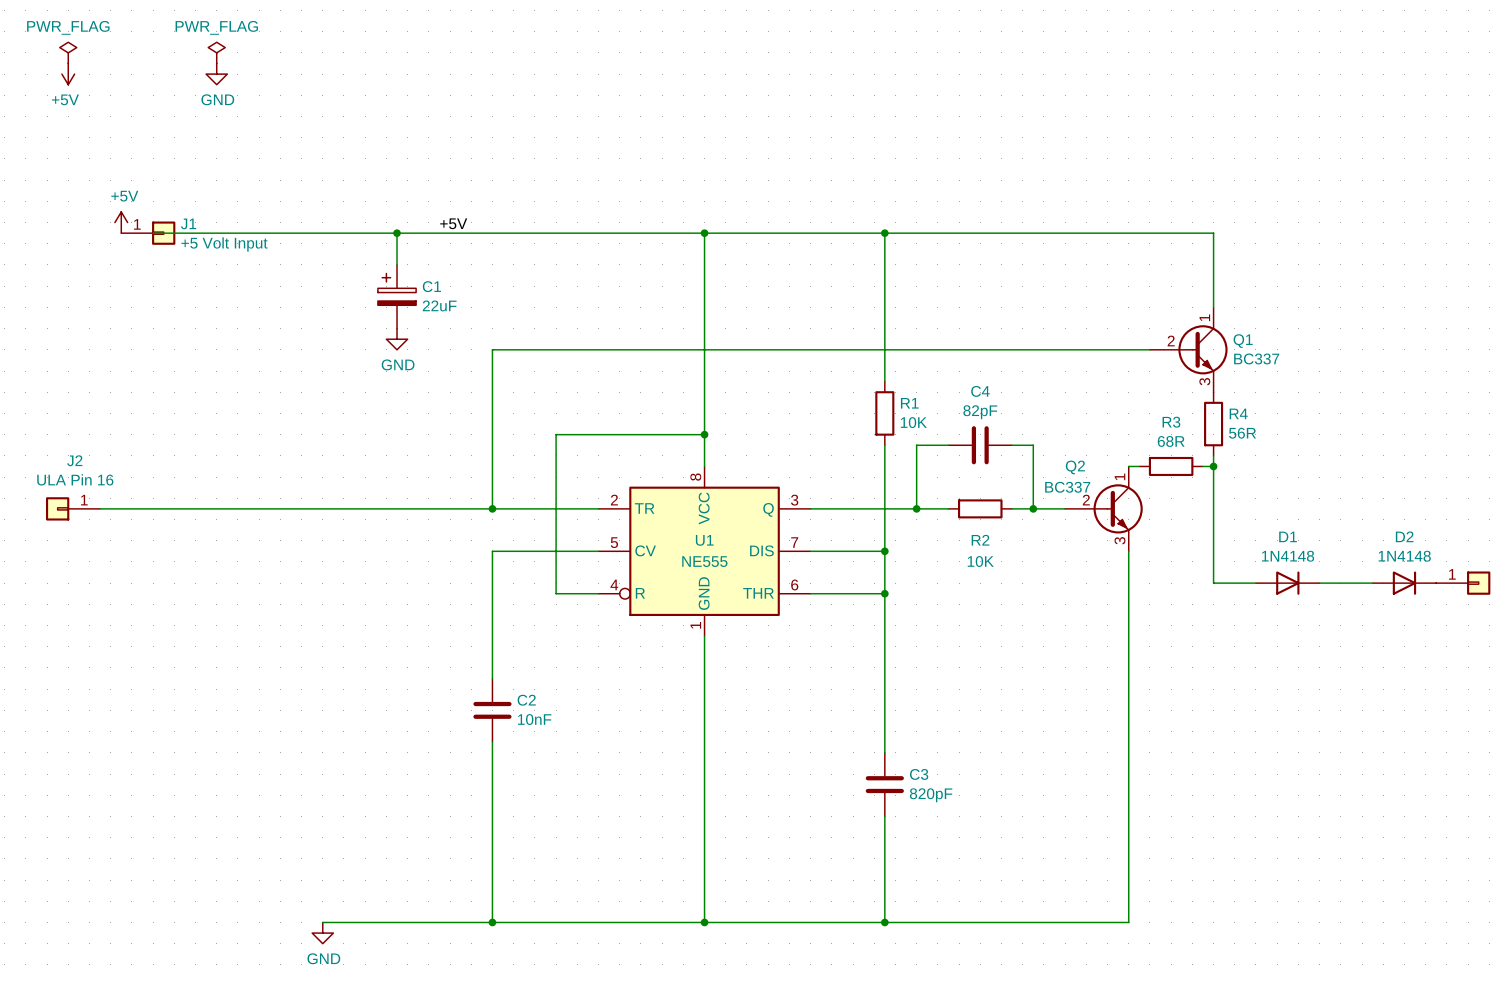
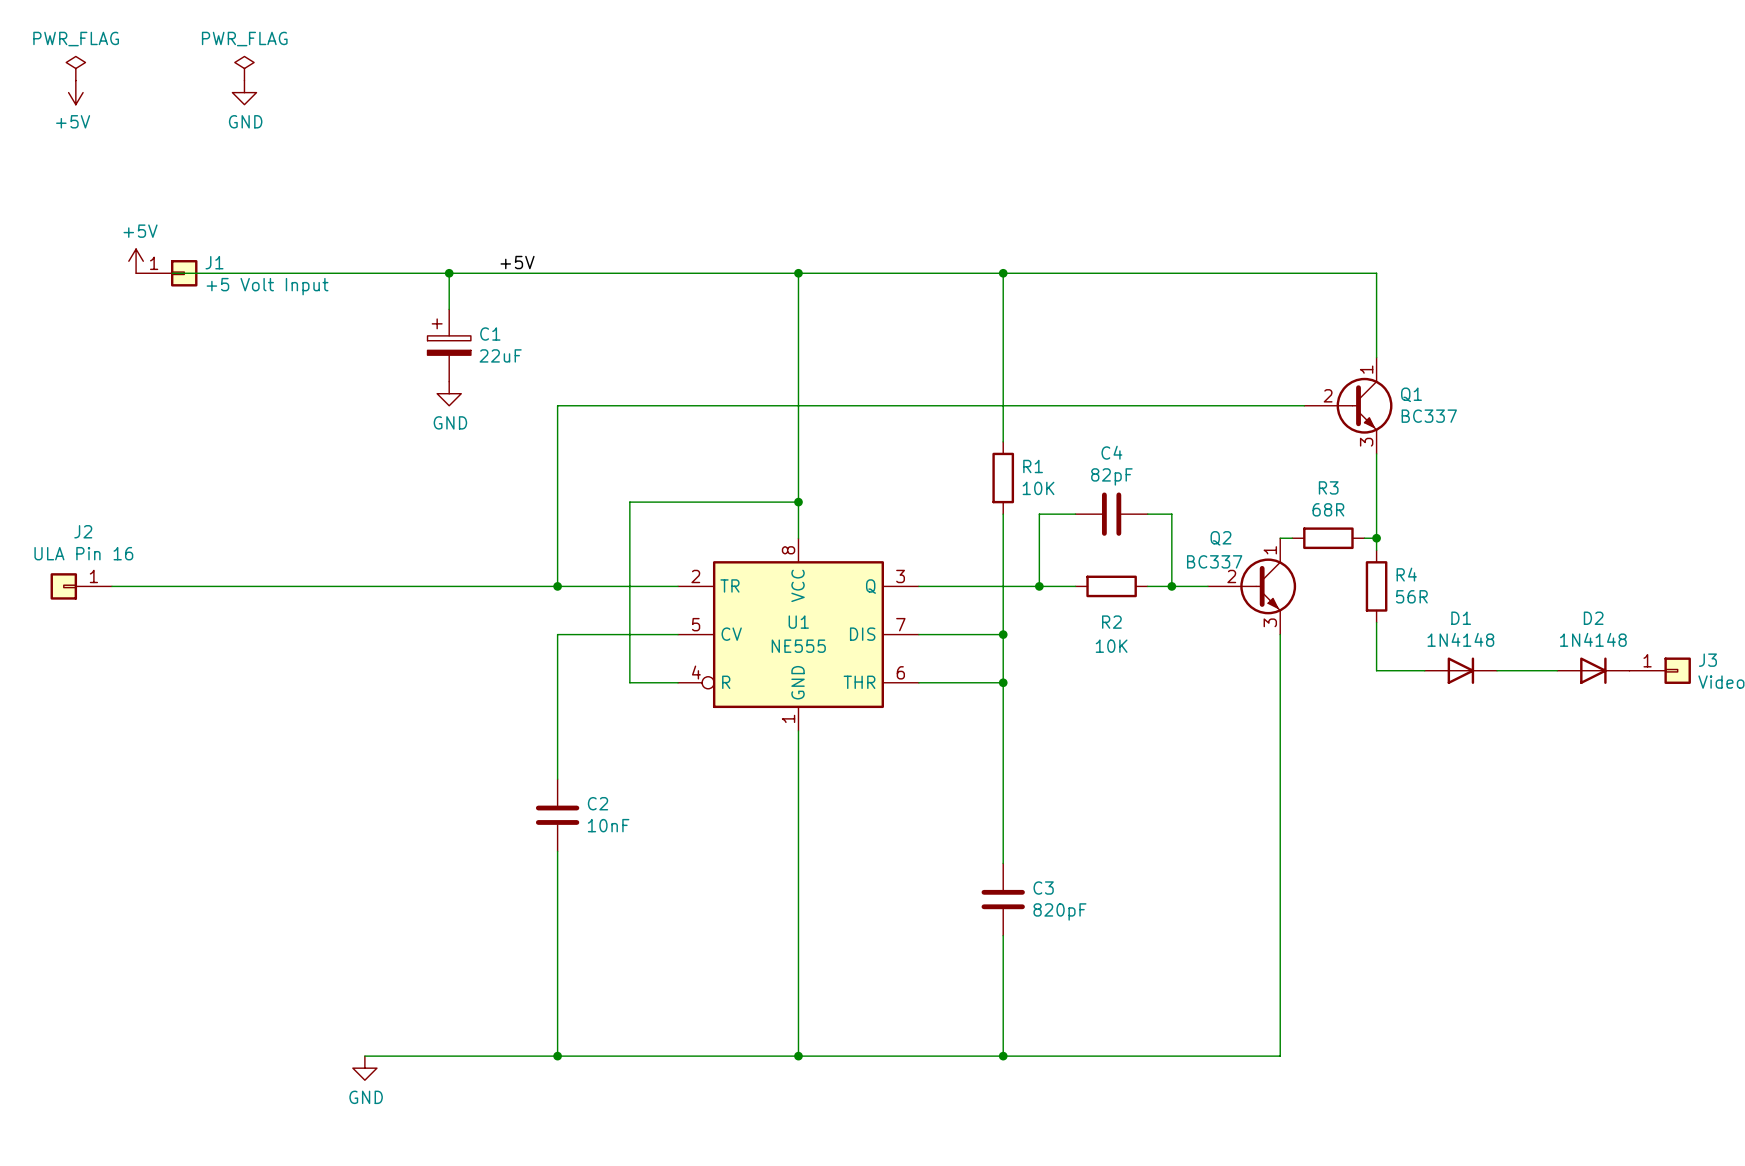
R4 position: (1213, 424) -> (1376, 586)
wire: (1213, 477) (1213, 540) -> (1376, 453) (1376, 526)

